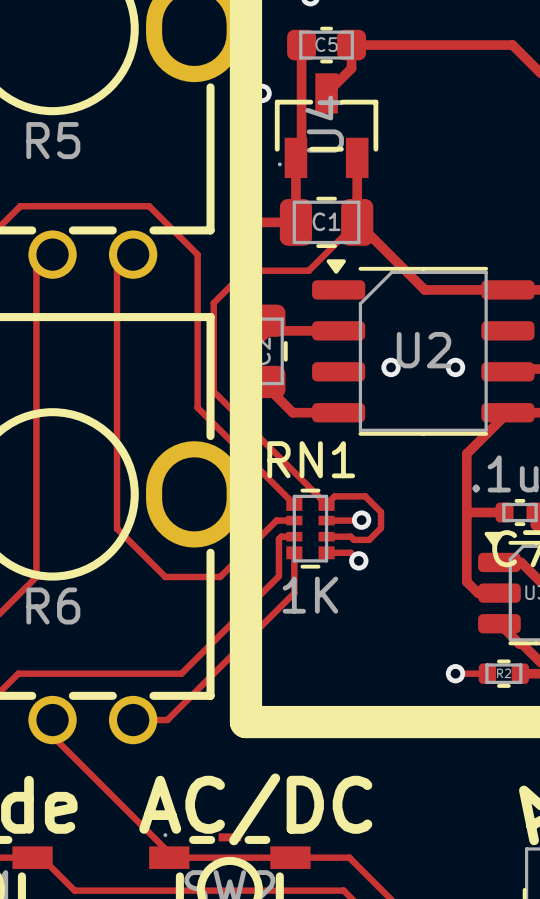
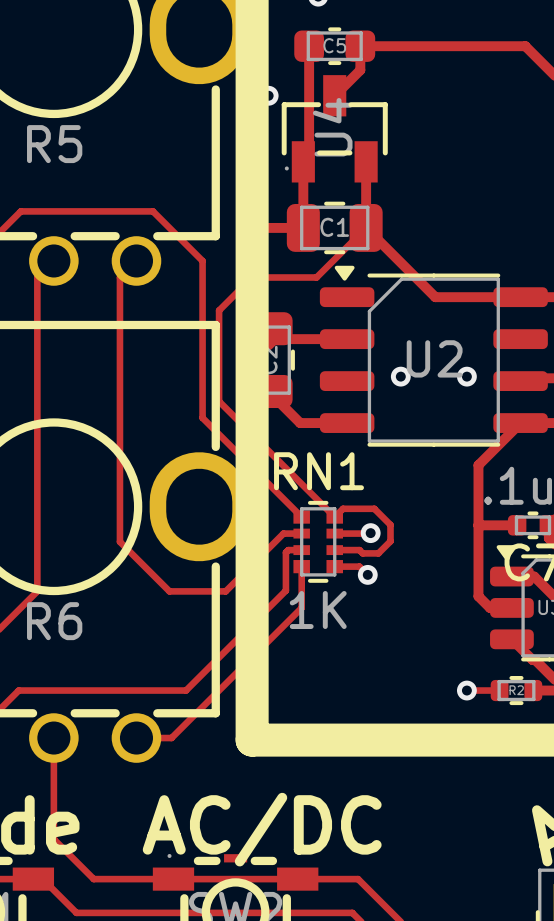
top track: (52, 736) (169, 852) (169, 857) -> (53, 754) (53, 839) (93, 879) (173, 879)

